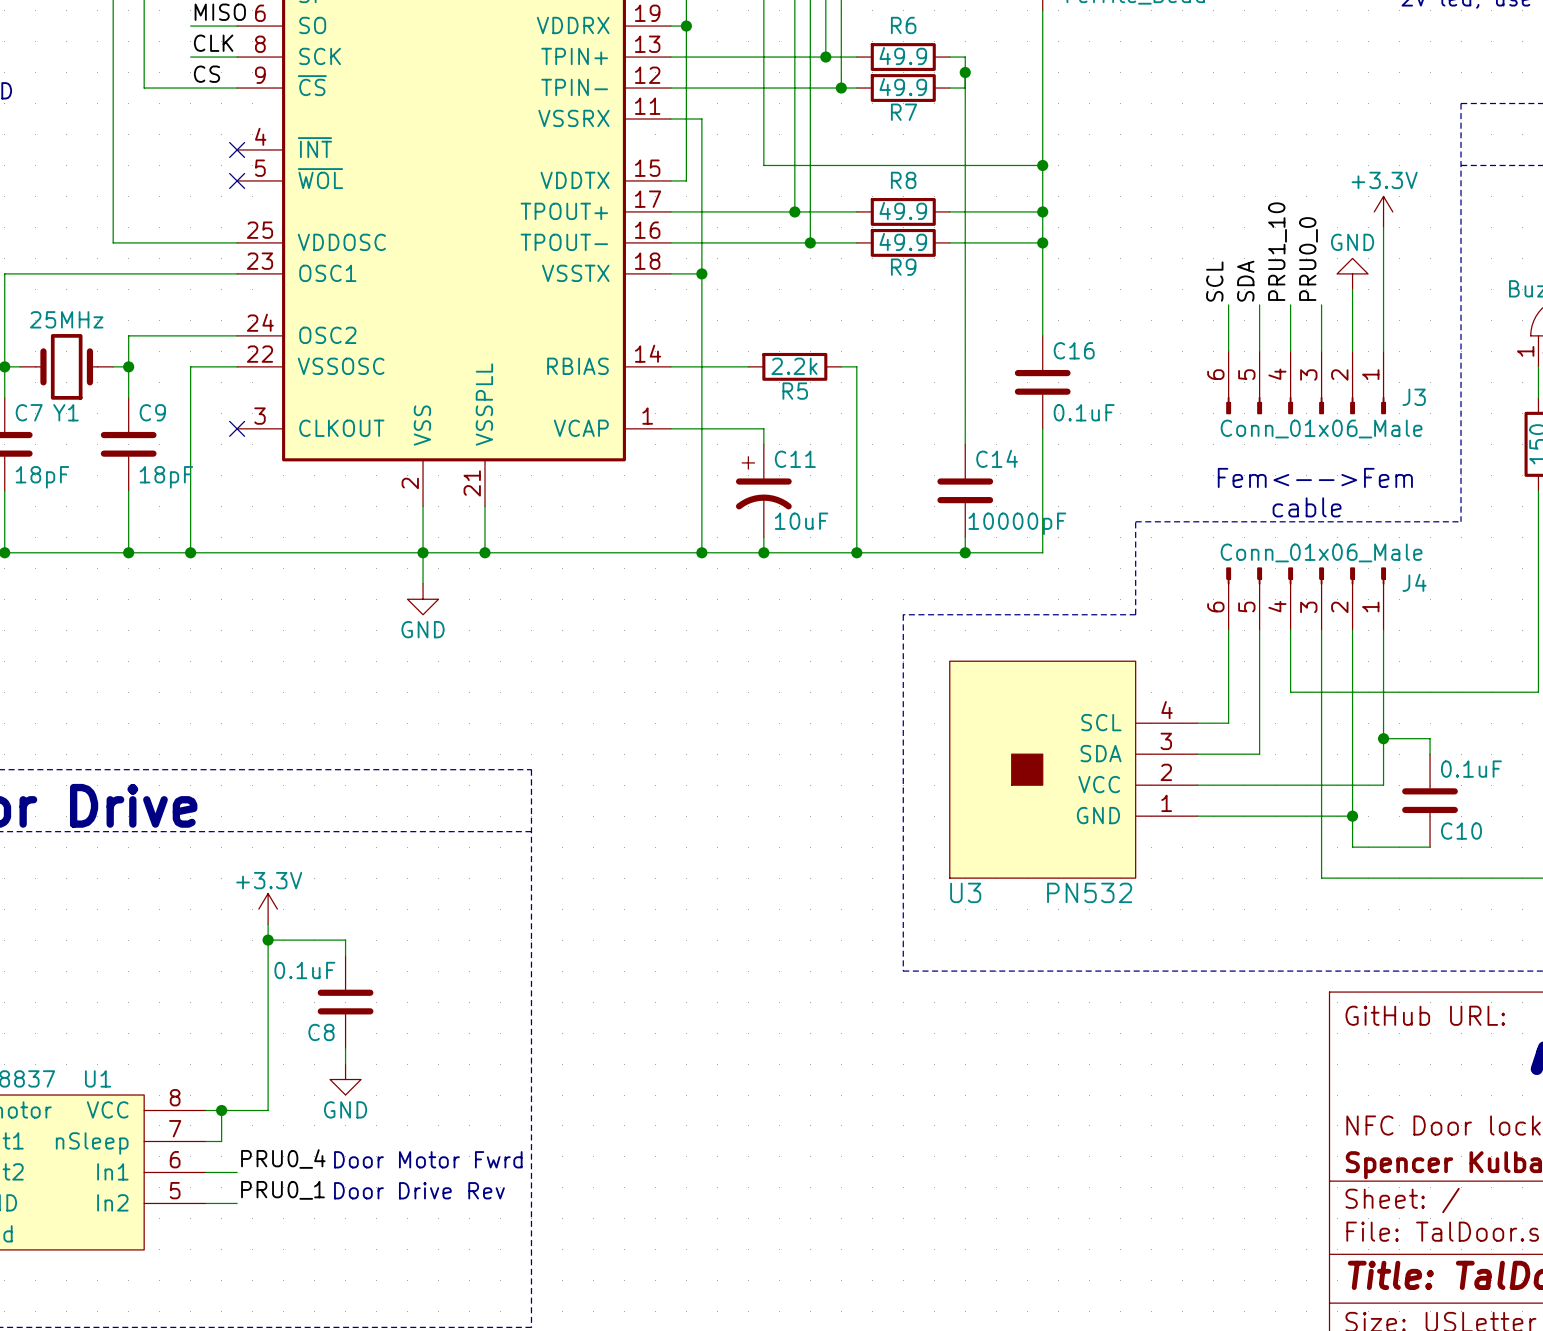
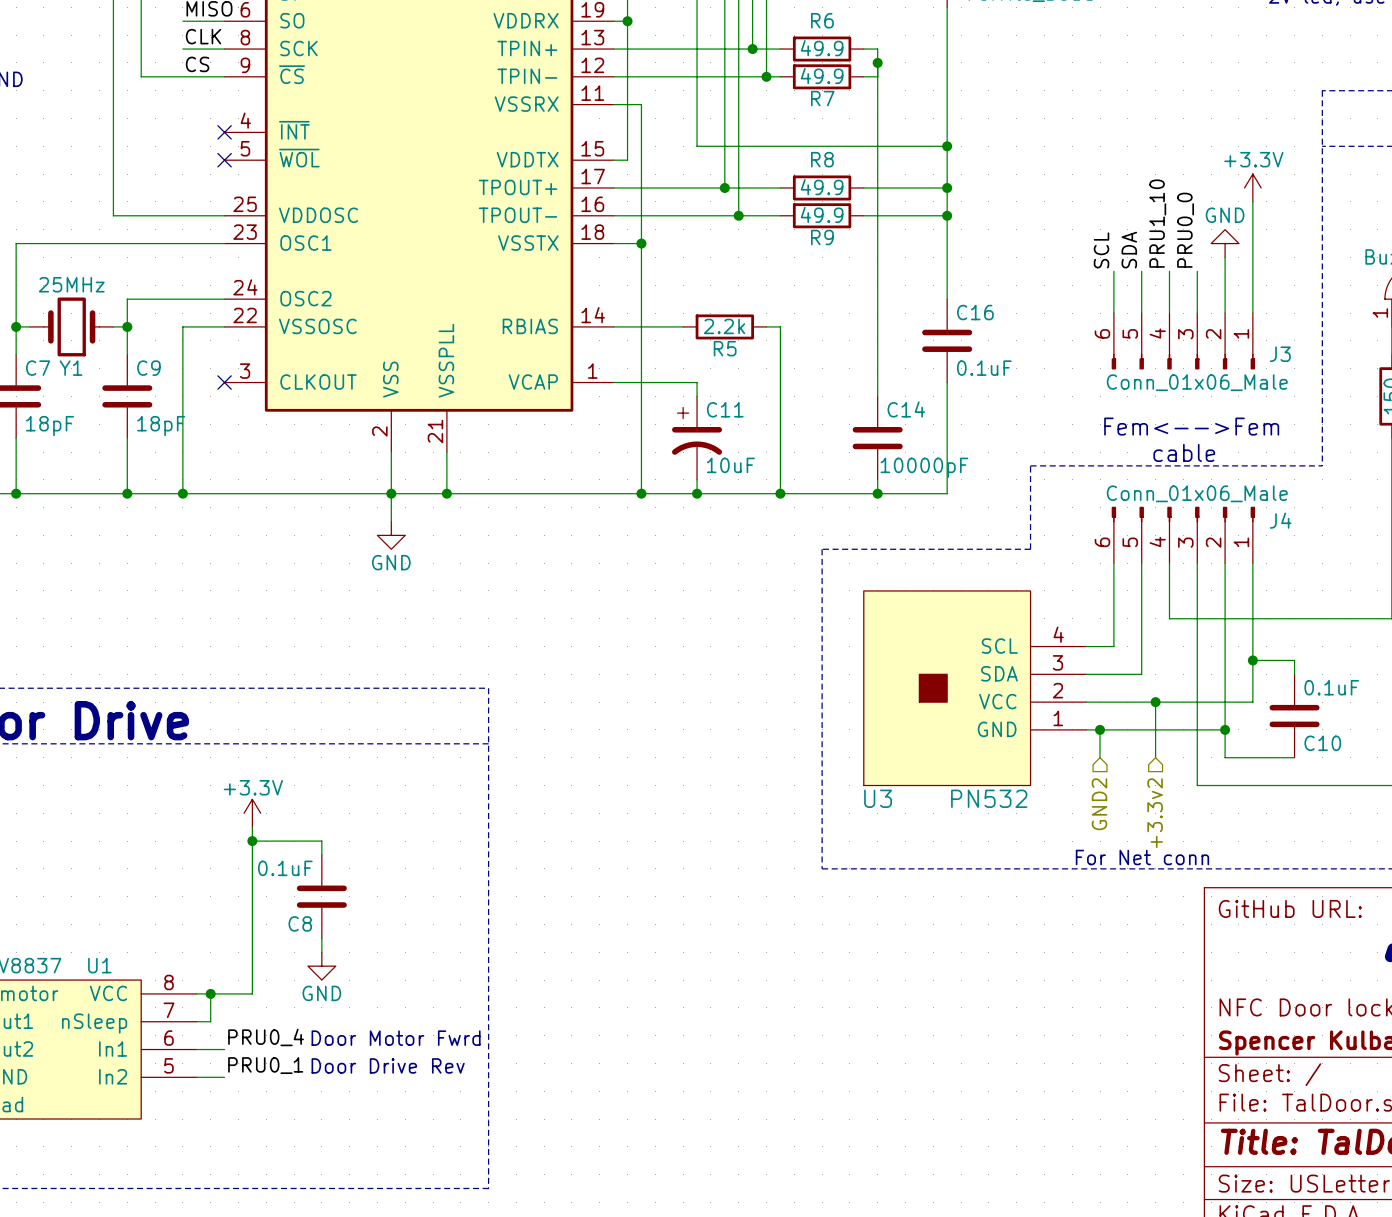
wire: none -> (1155, 702) (1155, 757)
junction: none -> (1155, 702)
wire: none -> (1100, 729) (1100, 757)
junction: none -> (1100, 729)
hierarchical label: none -> GND2 (1099, 804)
hierarchical label: none -> +3.3v2 (1155, 813)
text: none -> For Net conn (1142, 857)

